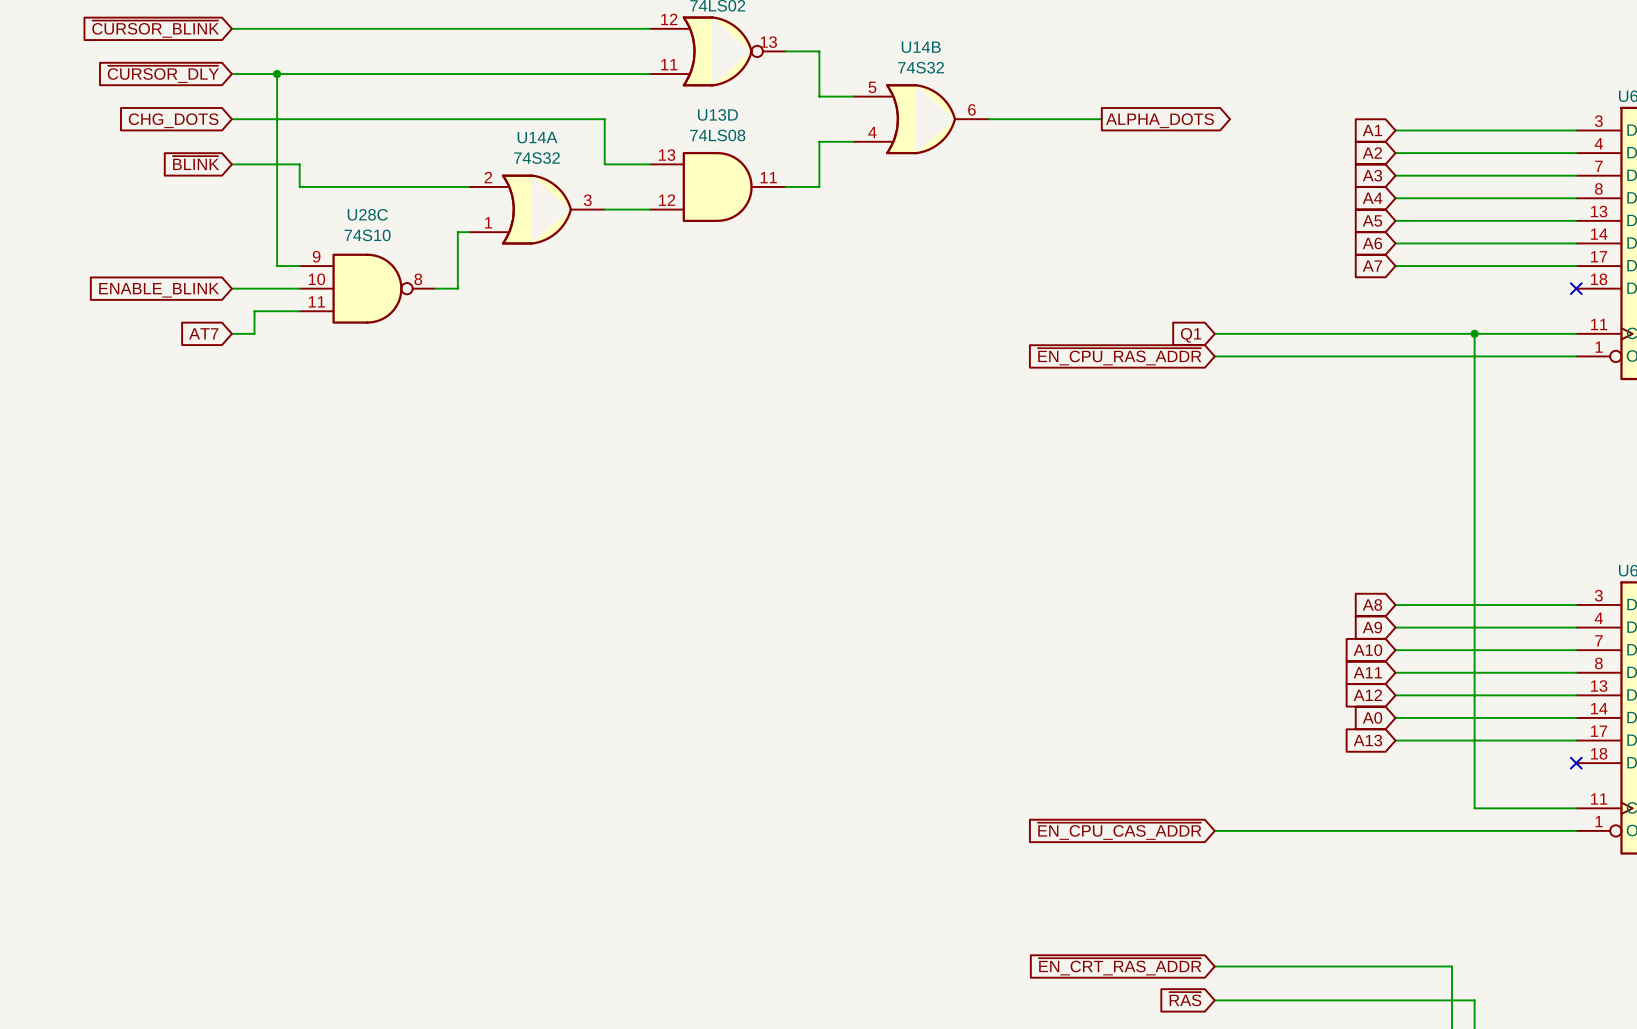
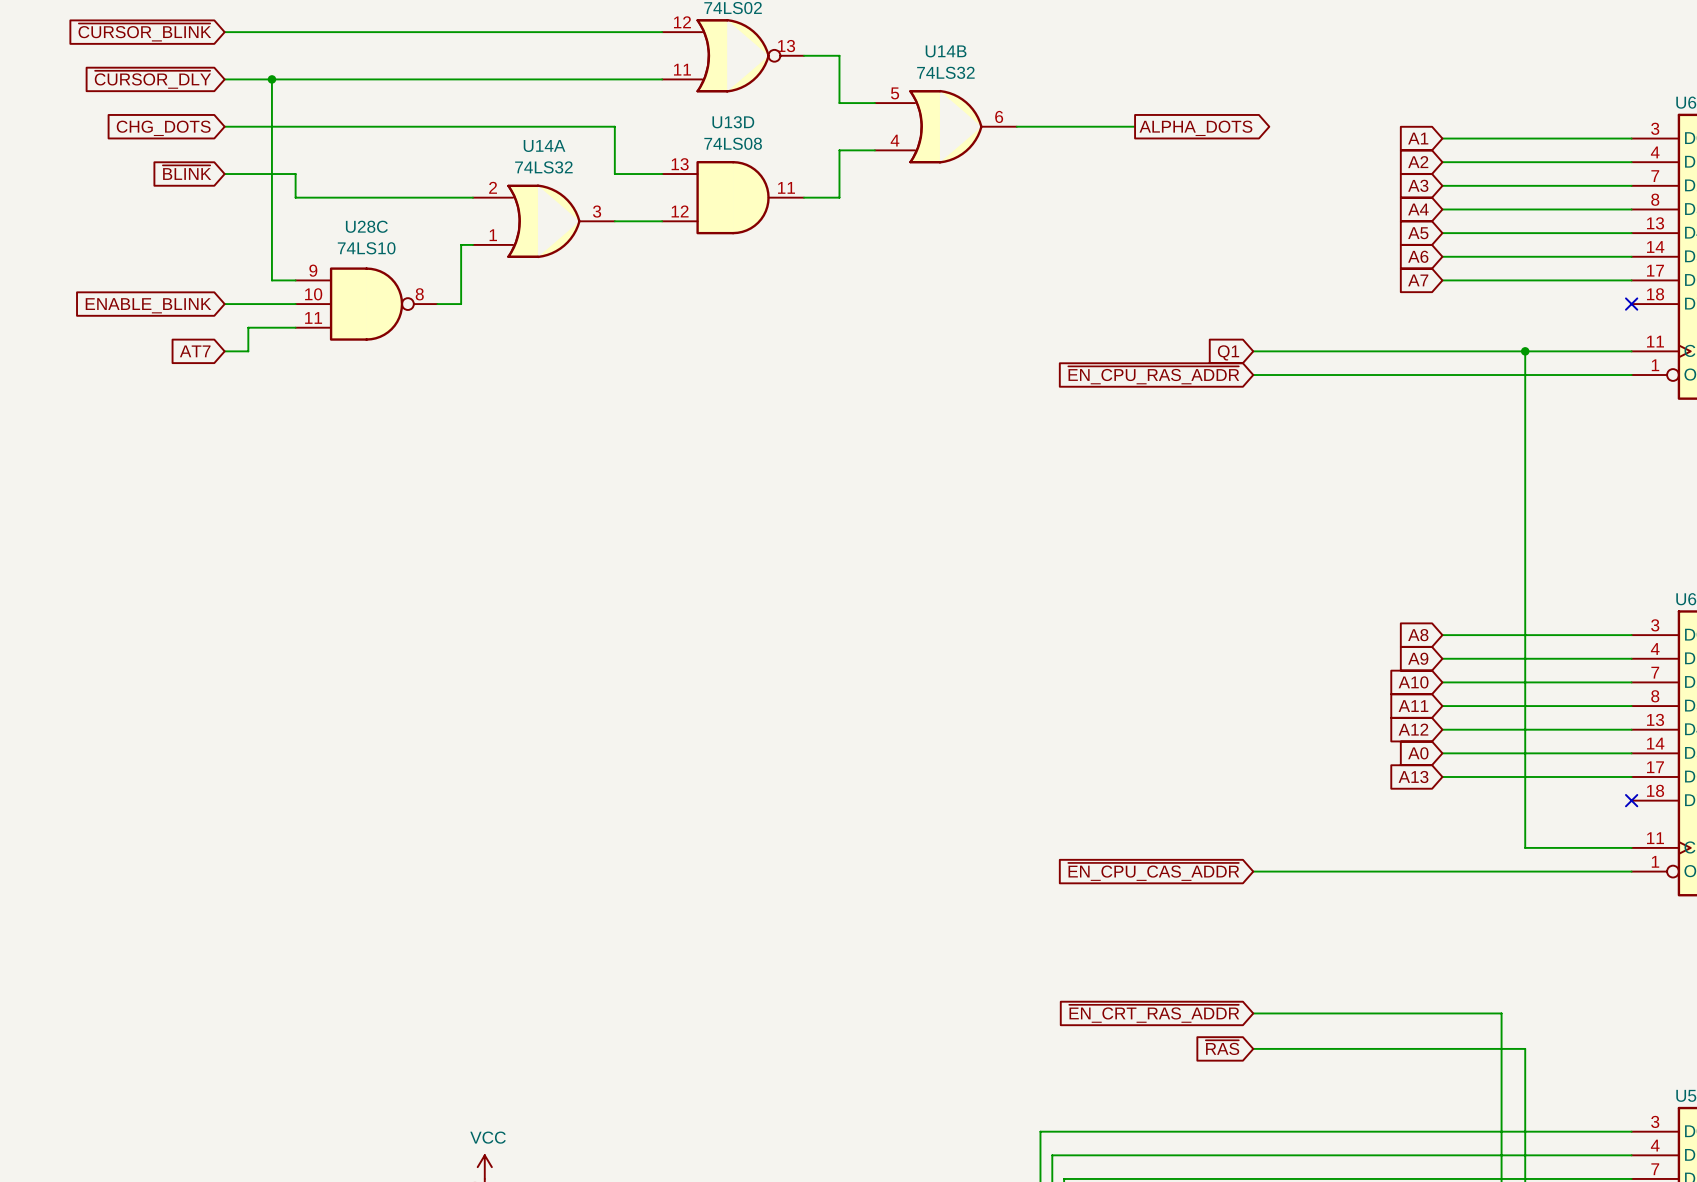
U14B value: 74S32 (921, 67) -> 74LS32 (945, 72)
U14A value: 74S32 (536, 158) -> 74LS32 (543, 167)
U28C value: 74S10 (367, 235) -> 74LS10 (366, 248)

